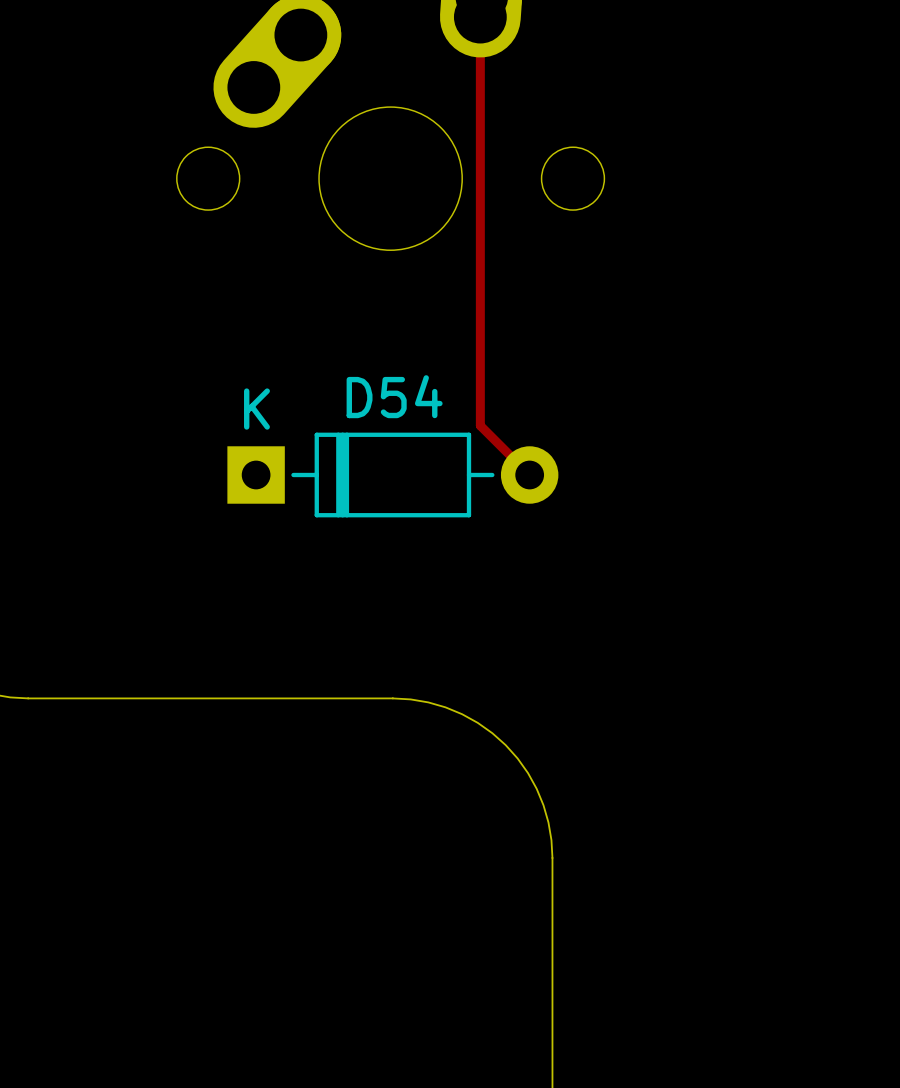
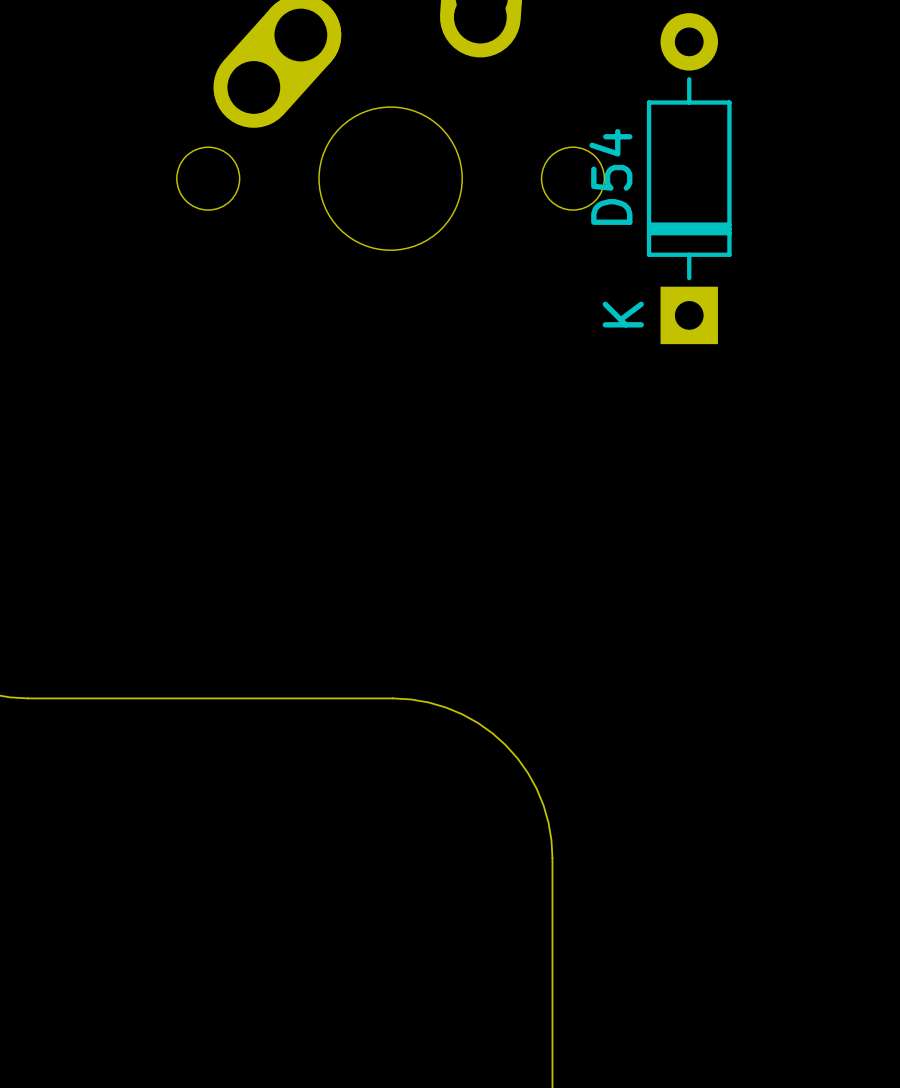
track: (480, 17) (480, 425) (529, 475) -> none
D54 rotation: 0° (392, 475) -> 90° counterclockwise (689, 178)
D54 position: (392, 475) -> (689, 178)

